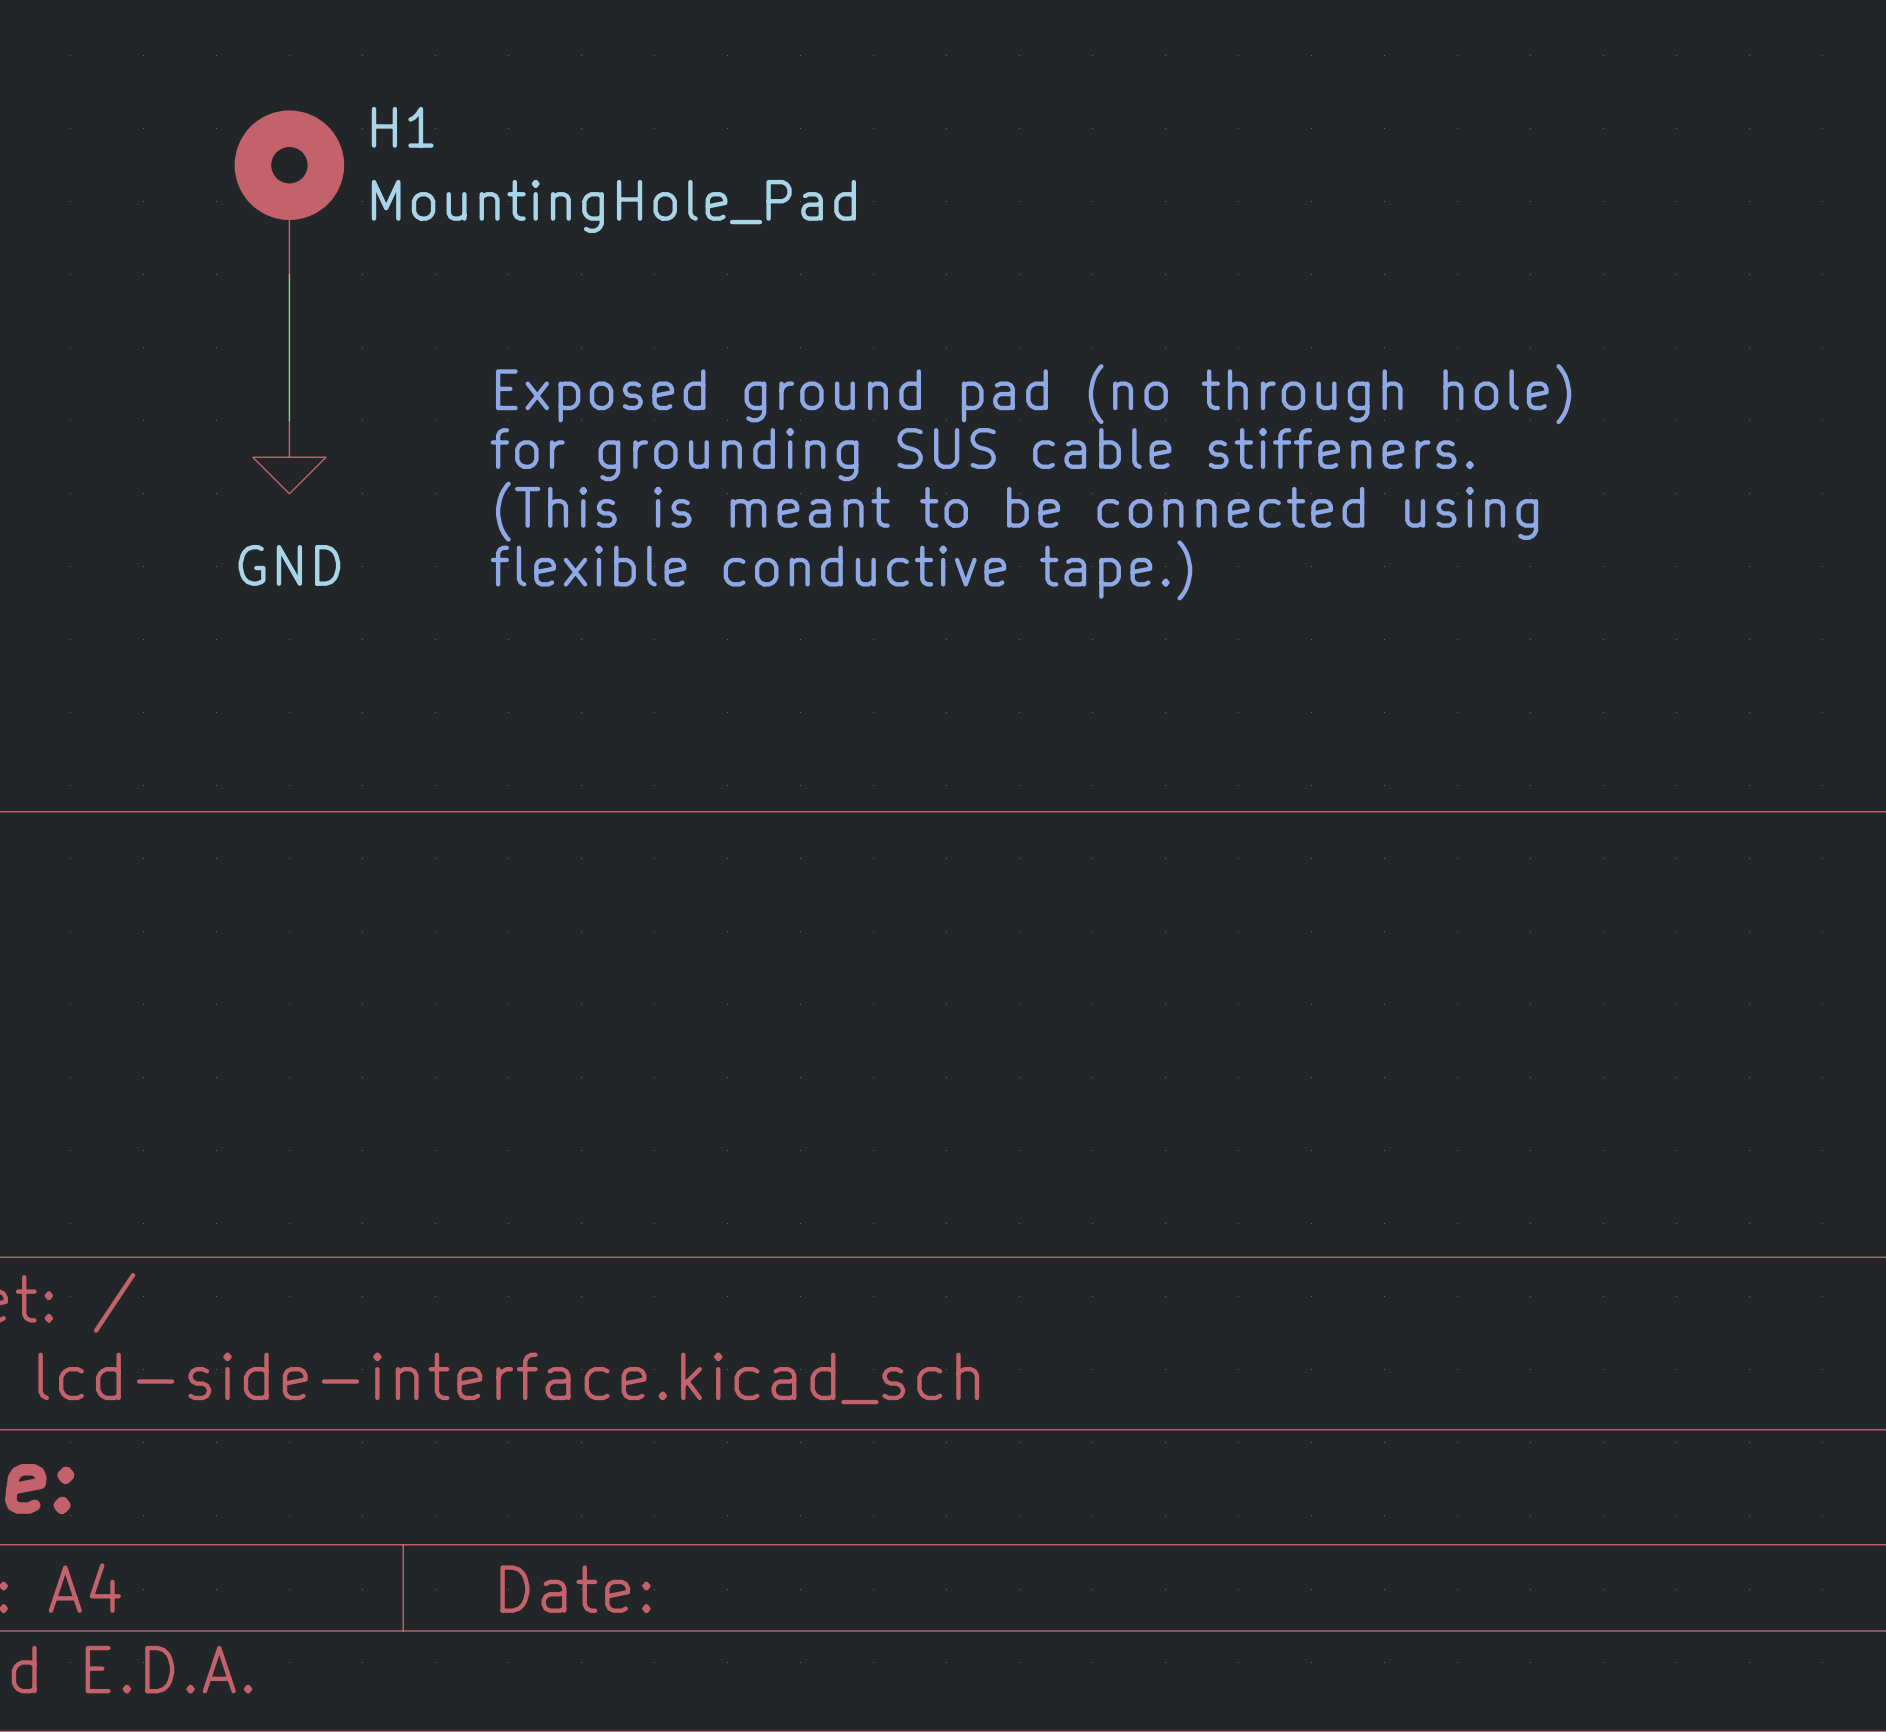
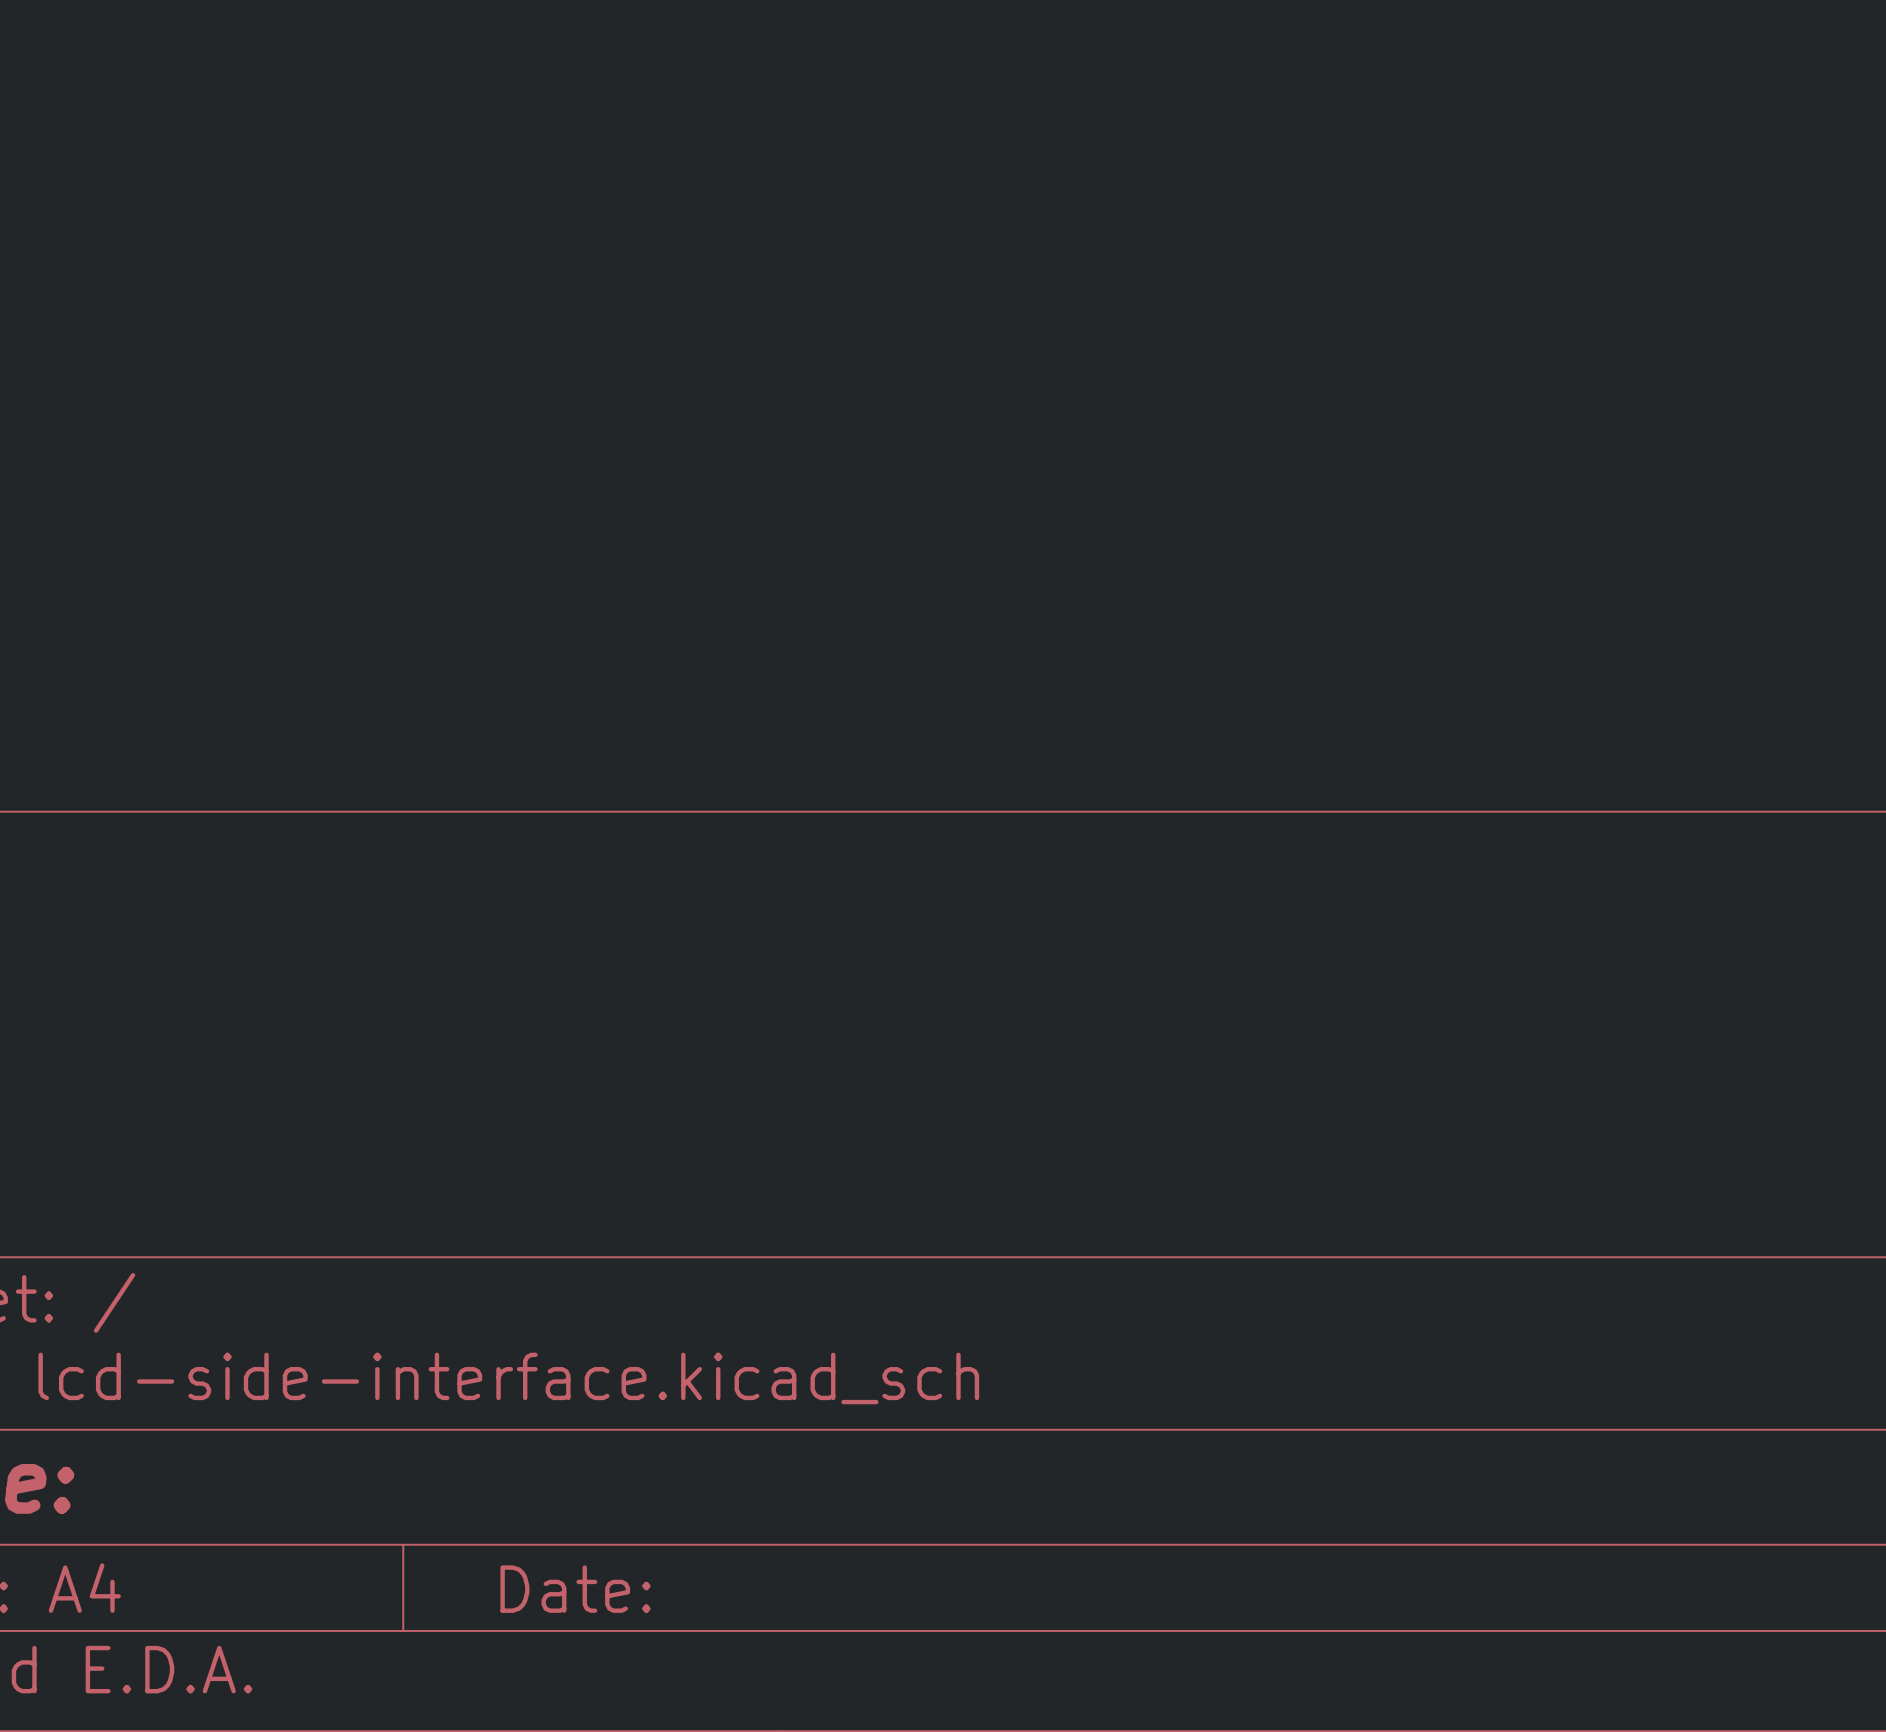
H1: MountingHole_Pad (289, 192) -> none
wire: (289, 274) (289, 420) -> none
text: Exposed ground pad (no through hole) (1033, 394) -> none
text: for grounding SUS cable stiffeners. (982, 454) -> none
power symbol: GND (289, 457) -> none
text: (This is meant to be connected using (1017, 511) -> none
text: flexible conductive tape.) (841, 570) -> none

